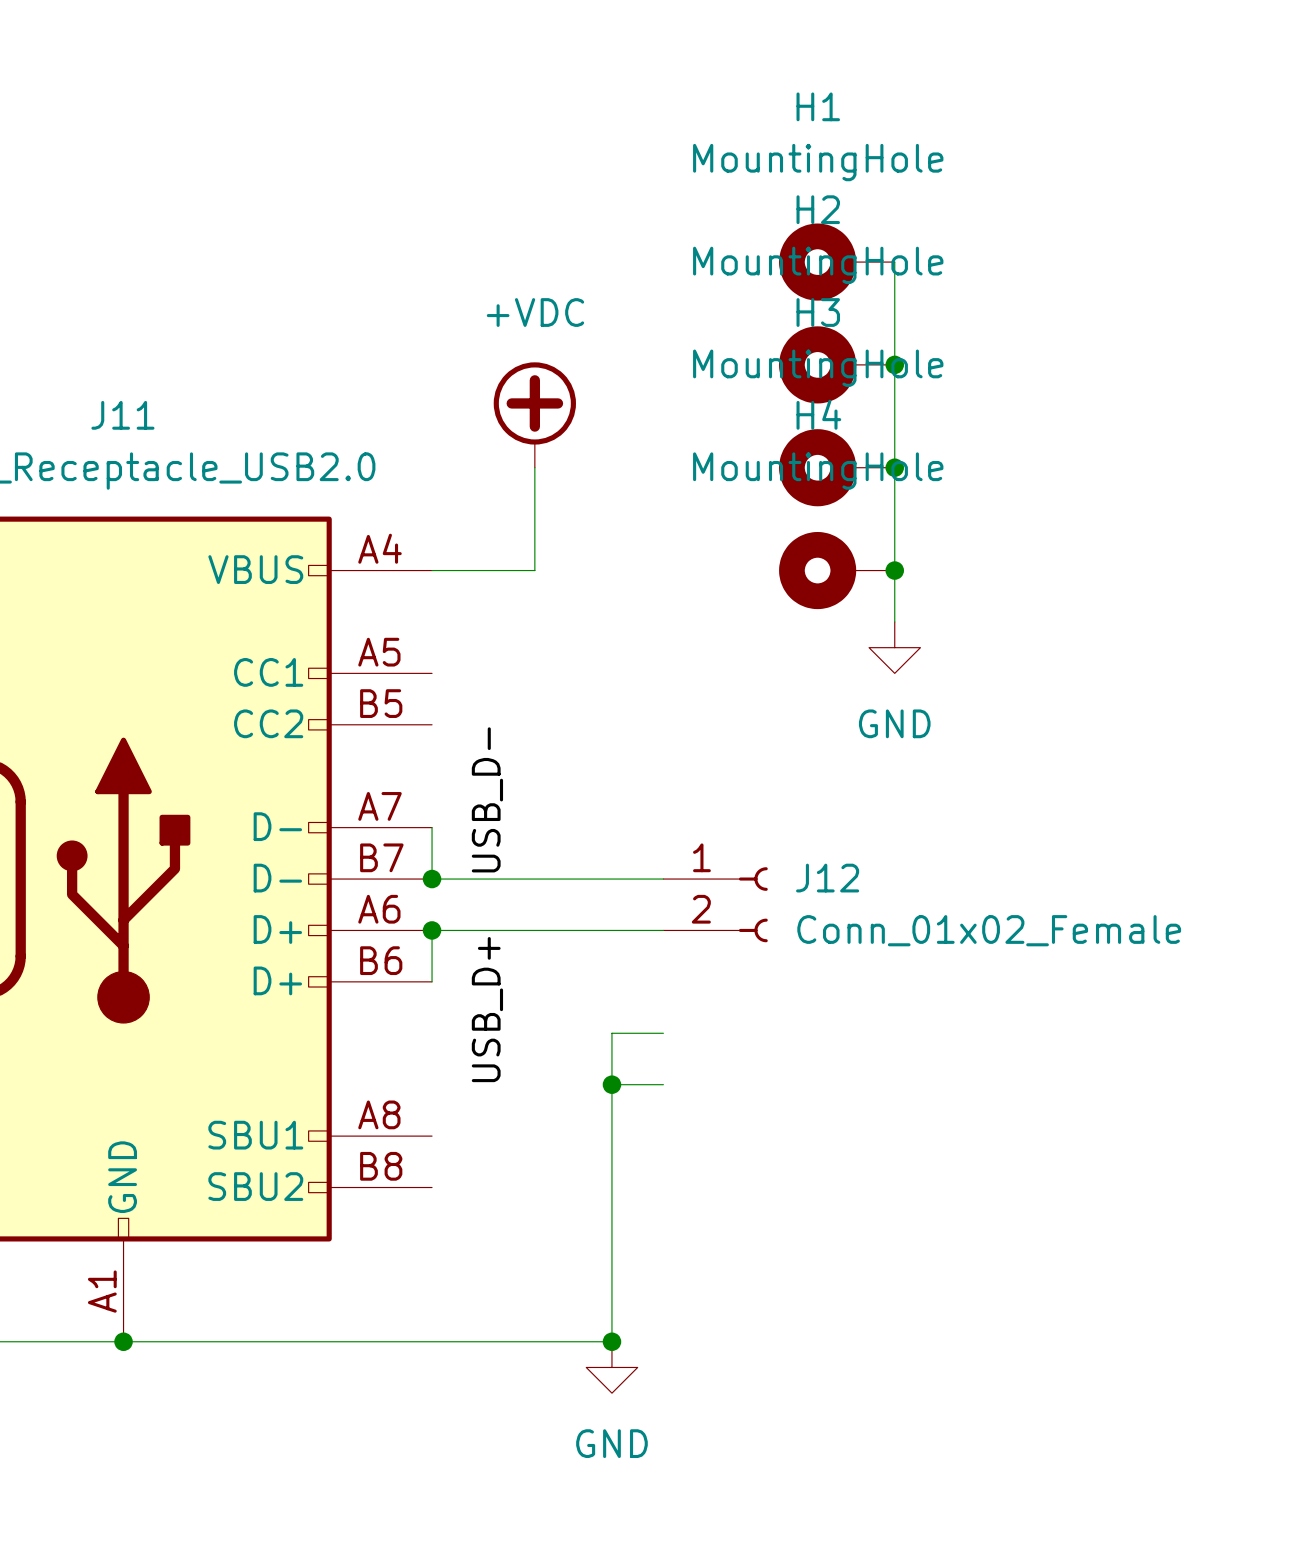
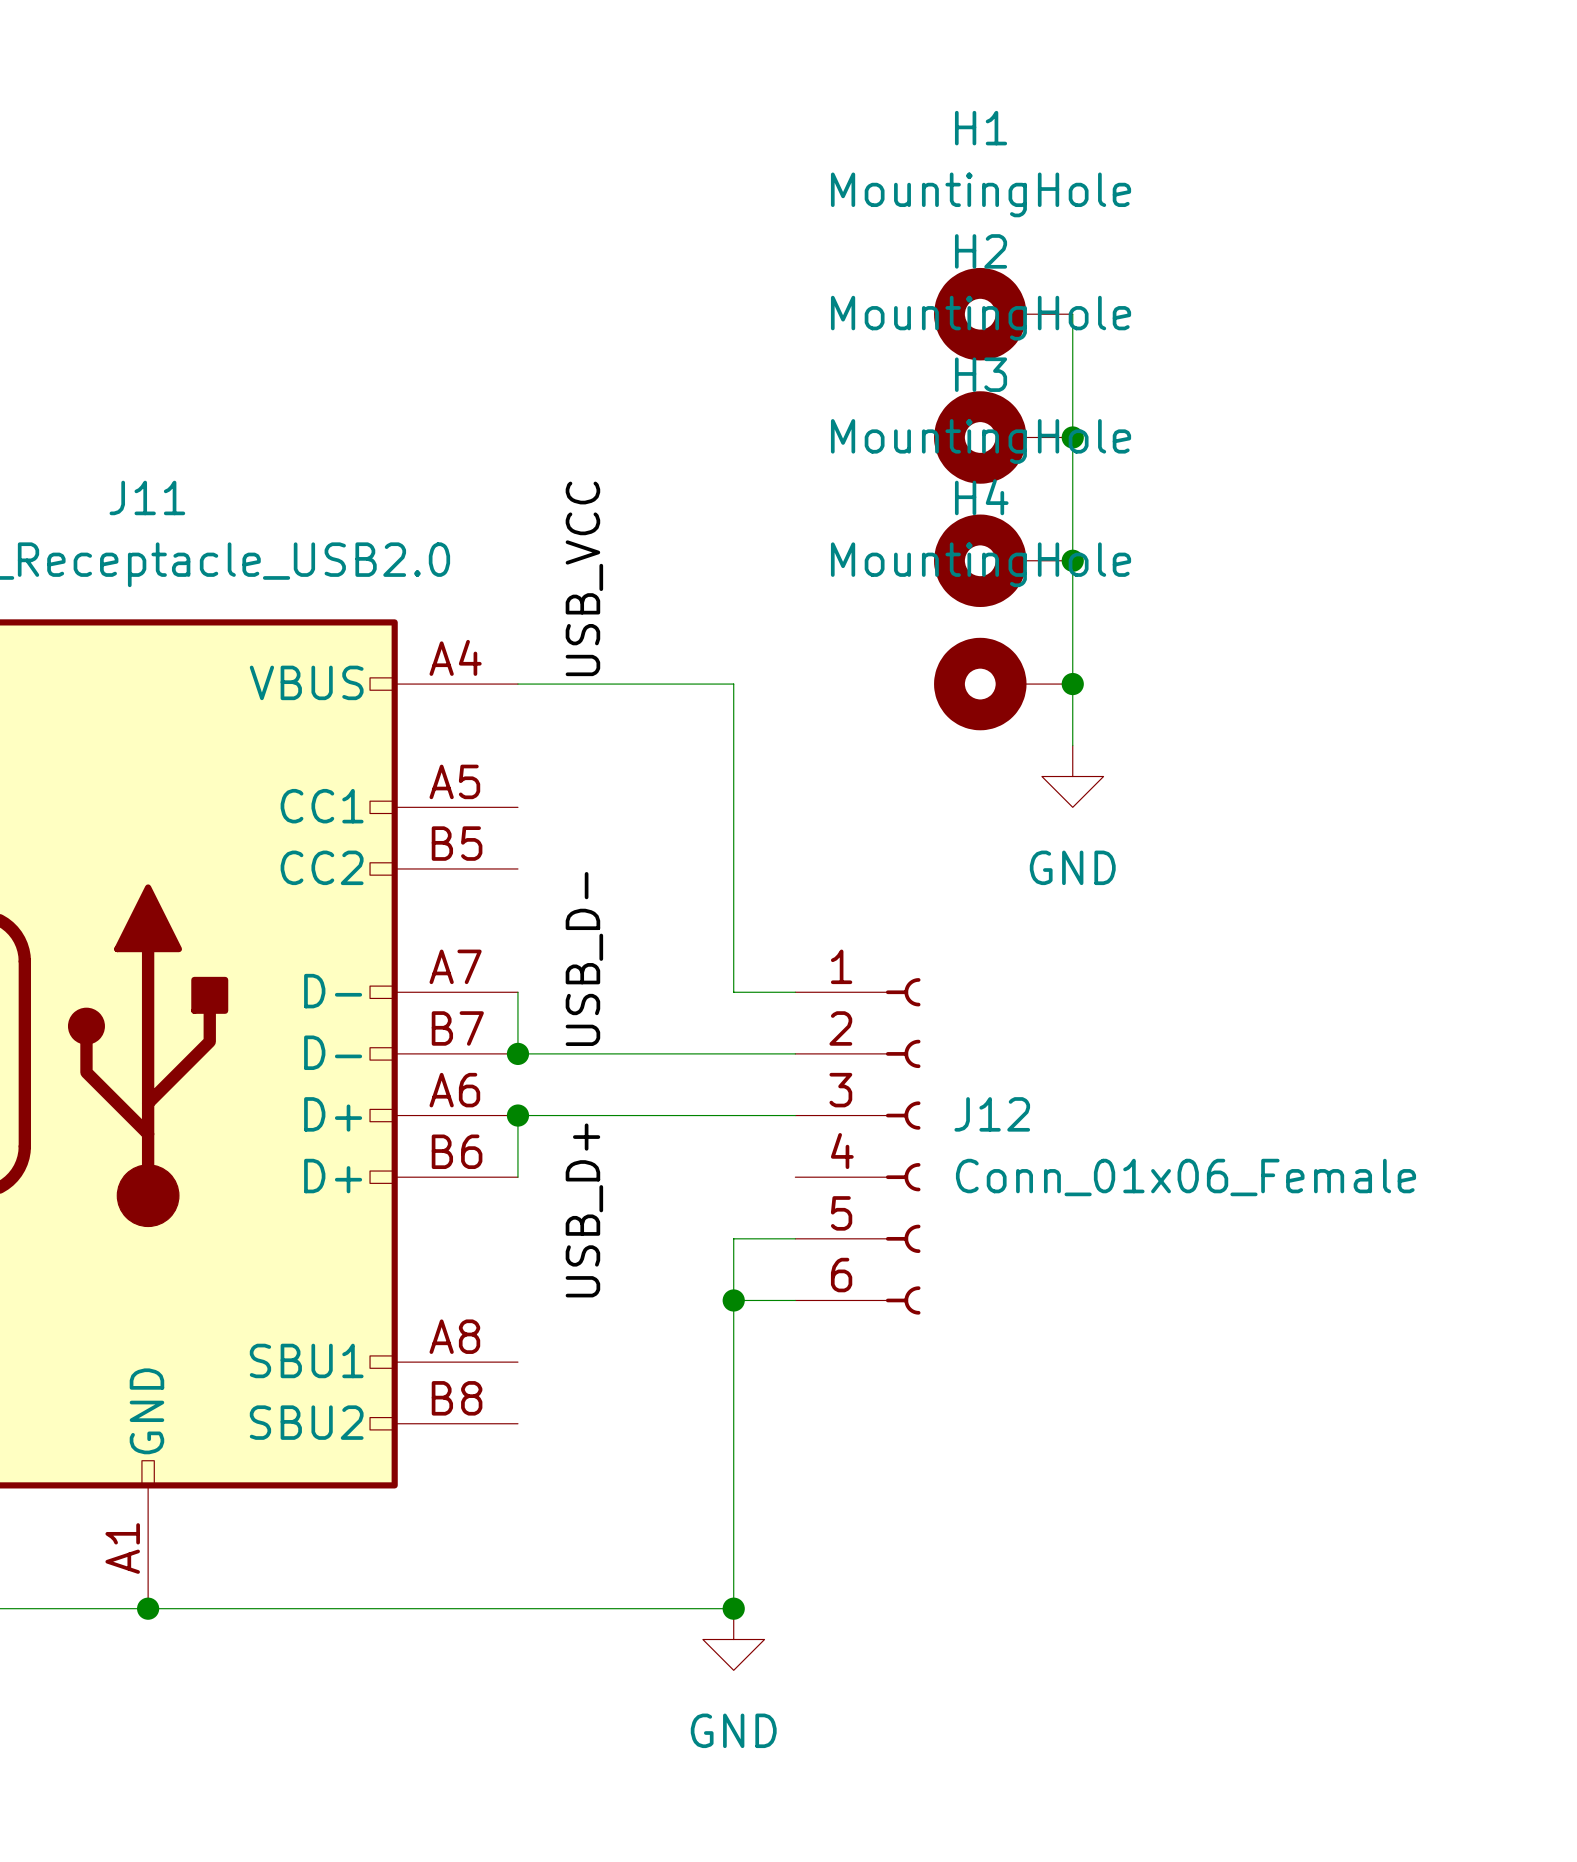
power symbol: +VDC (534, 415) -> none
wire: (534, 467) (534, 570) -> (795, 992) (733, 992) (733, 684) (641, 684)
label: none -> USB_VCC (584, 578)
J12 symbol: [663, 867, 768, 943] -> [795, 978, 921, 1315]
J12 value: Conn_01x02_Female (989, 930) -> Conn_01x06_Female (1185, 1177)

